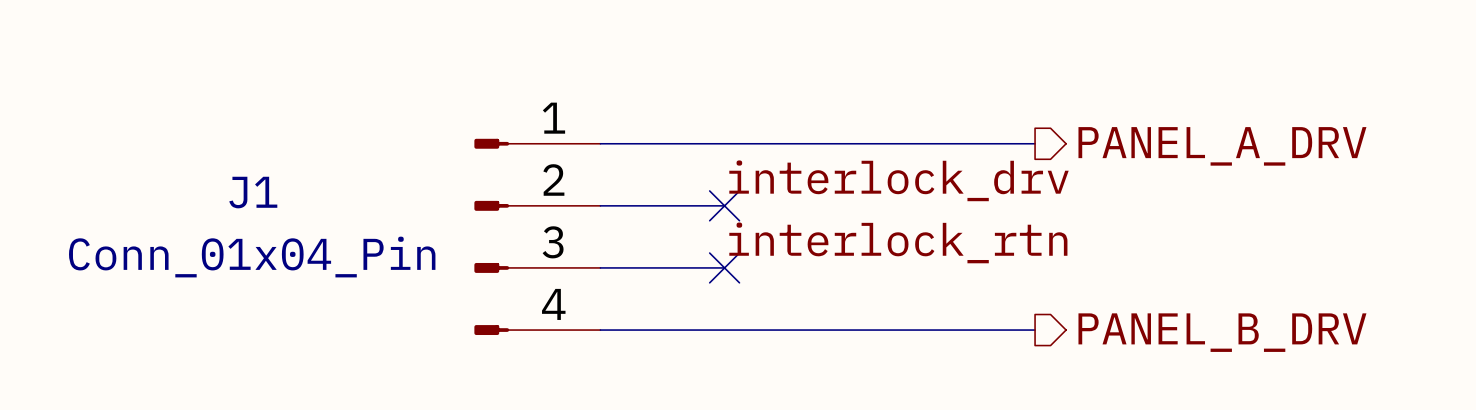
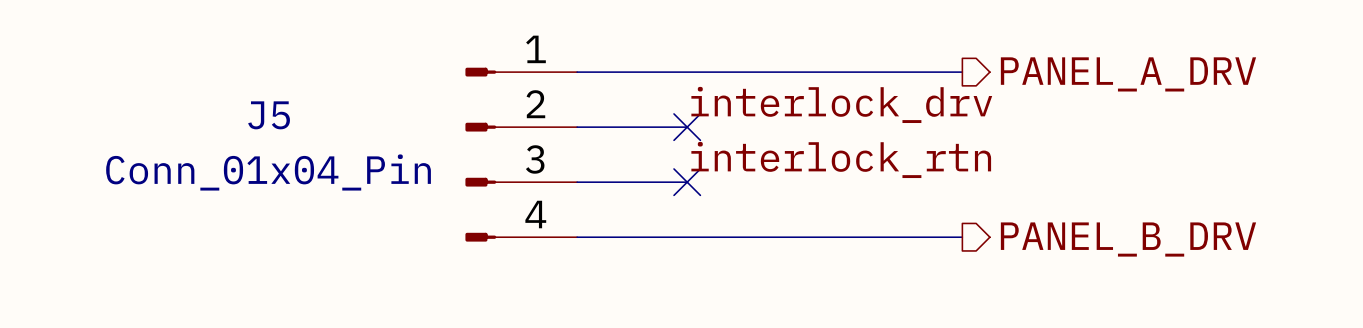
J1 name: J1 (253, 192) -> J5 (269, 115)

